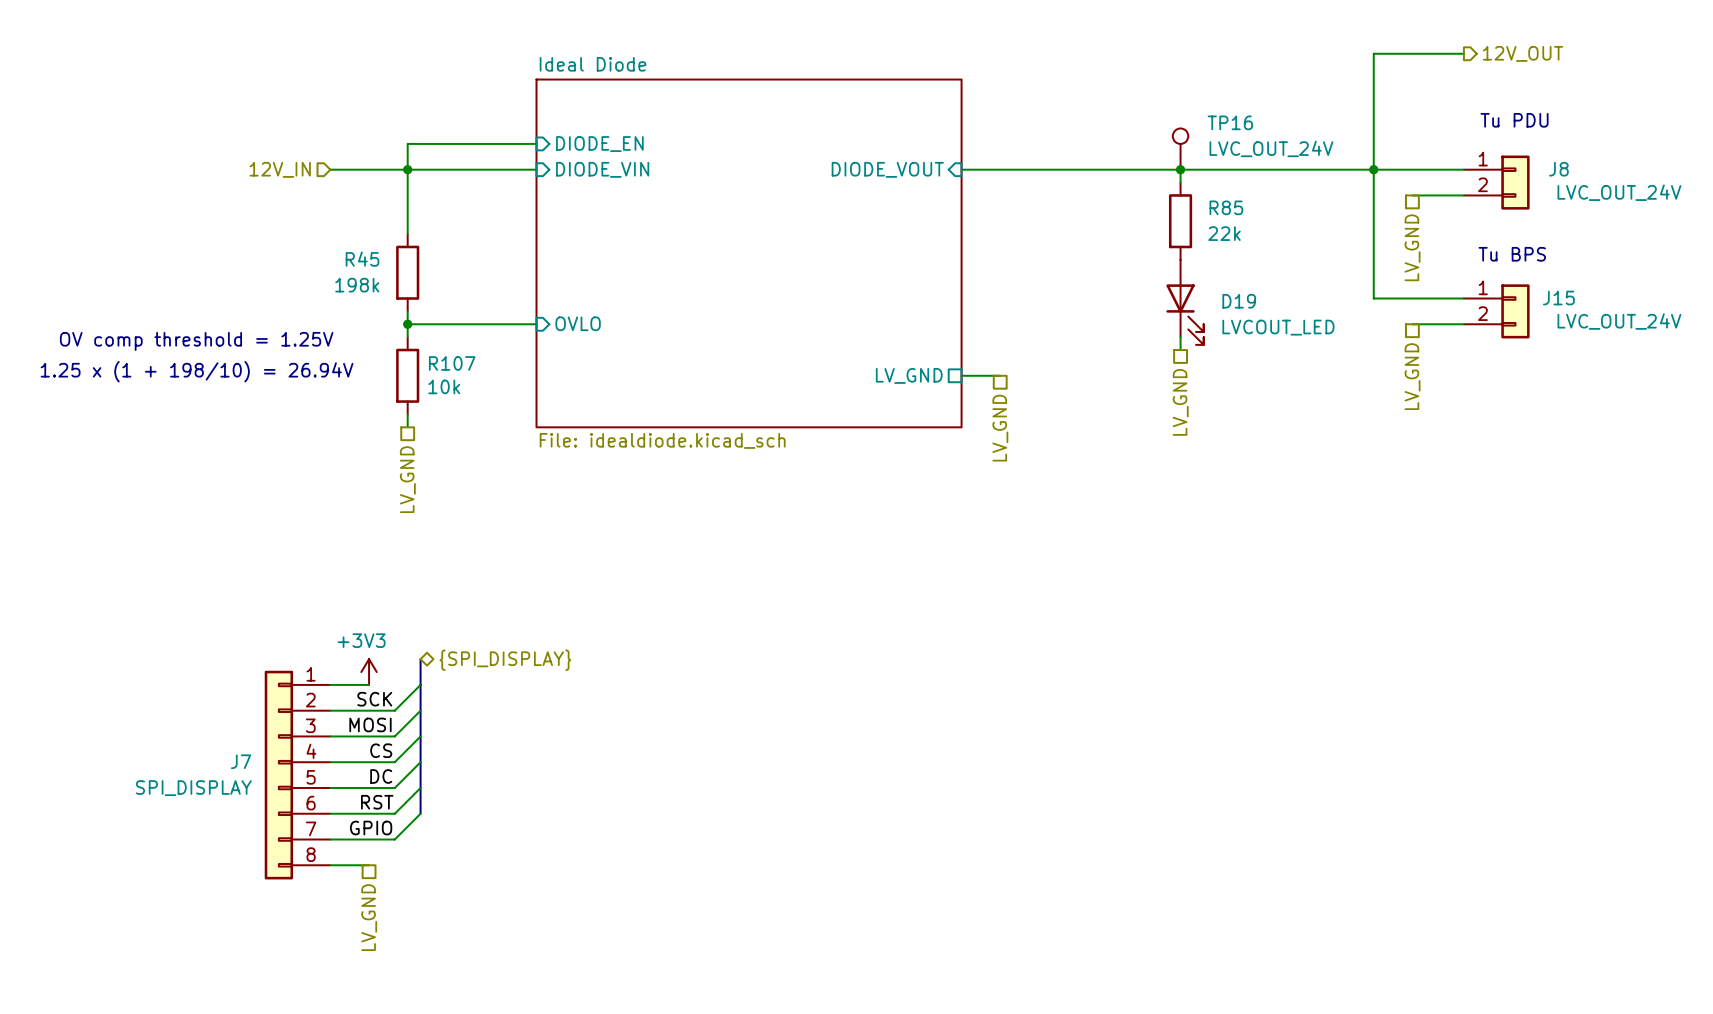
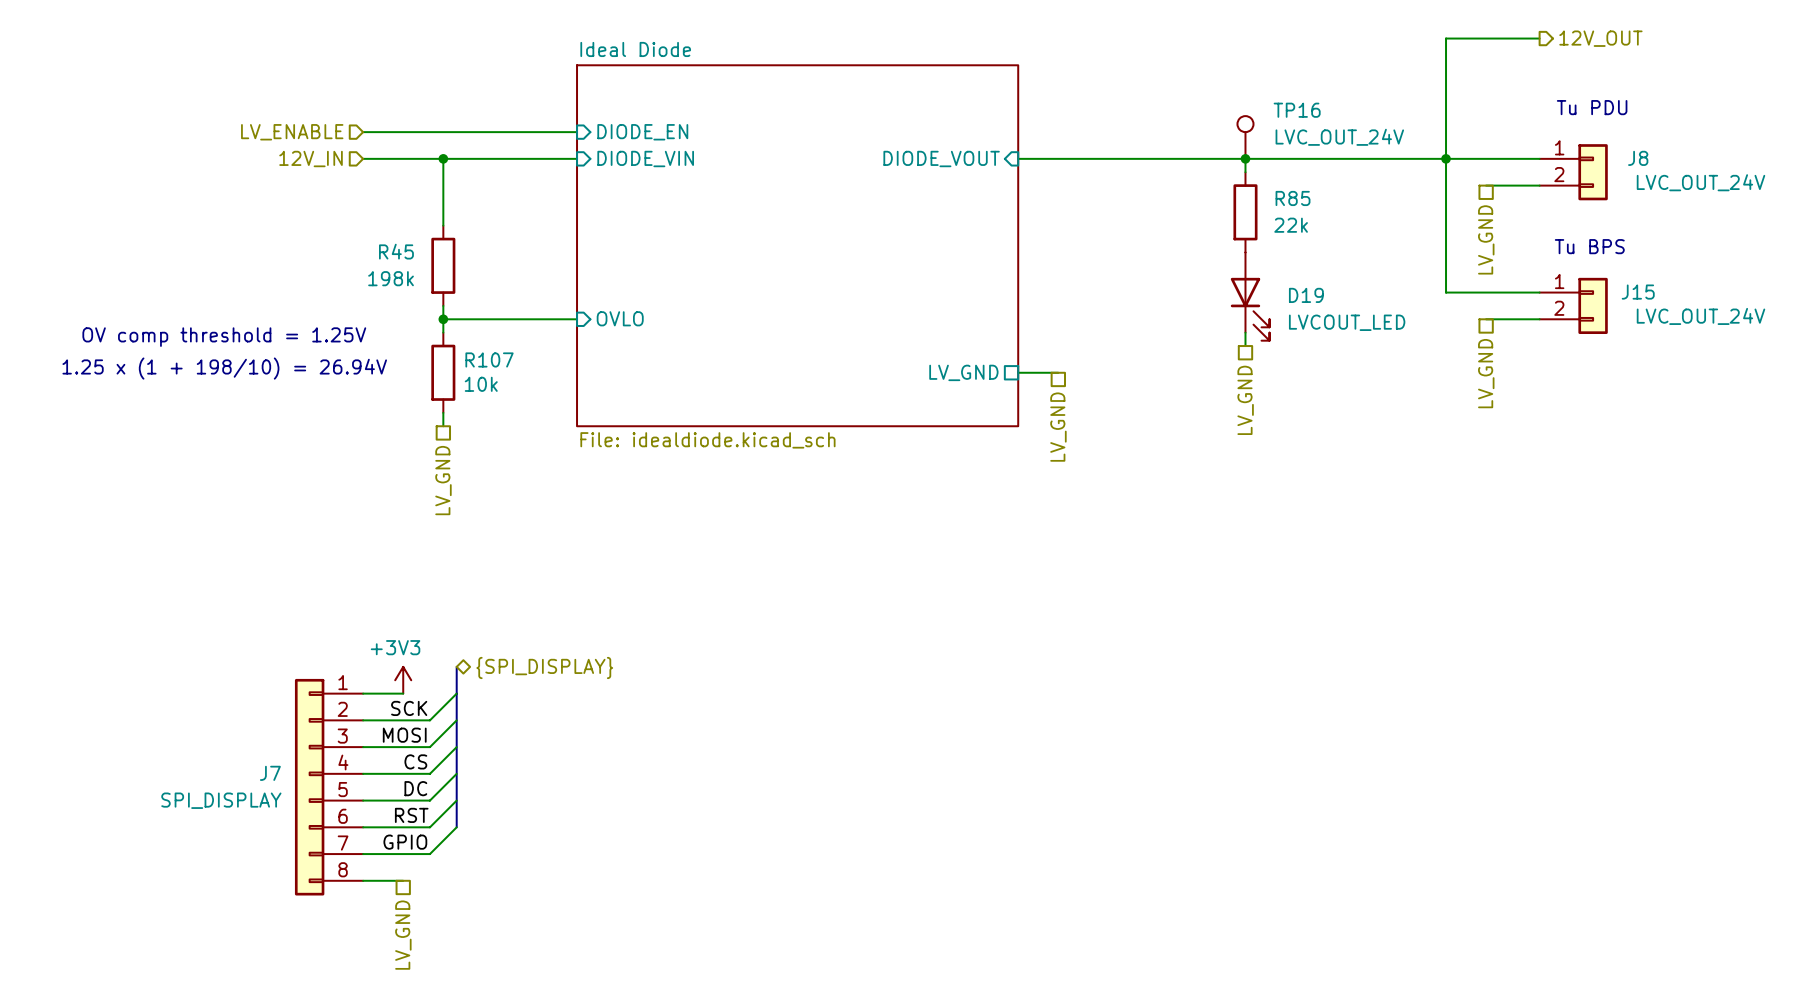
wire: (407, 143) (407, 169) -> (443, 132) (363, 132)
hierarchical label: none -> LV_ENABLE (292, 132)

